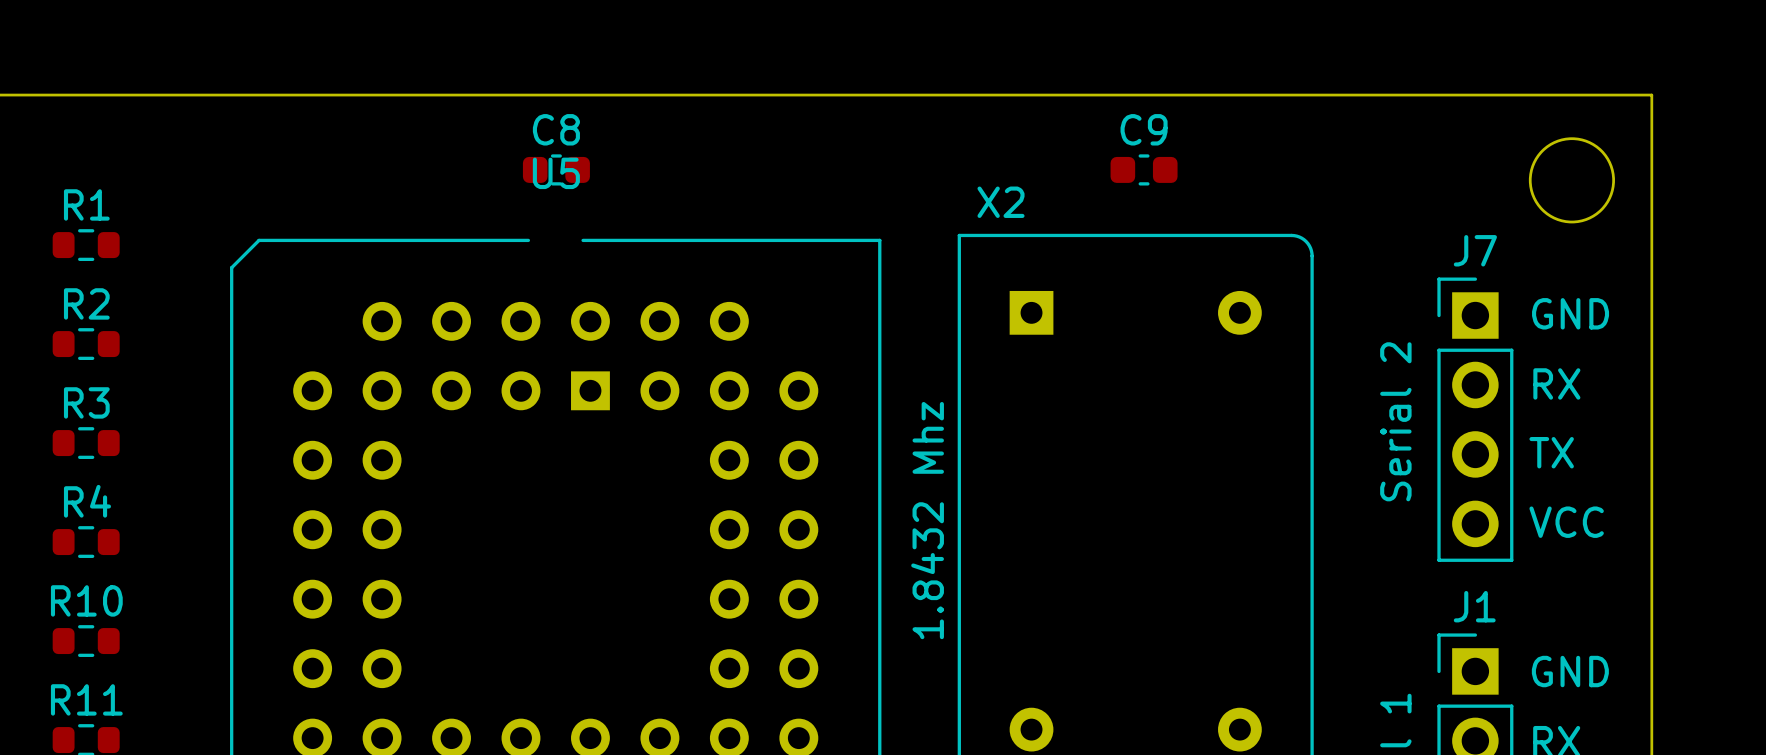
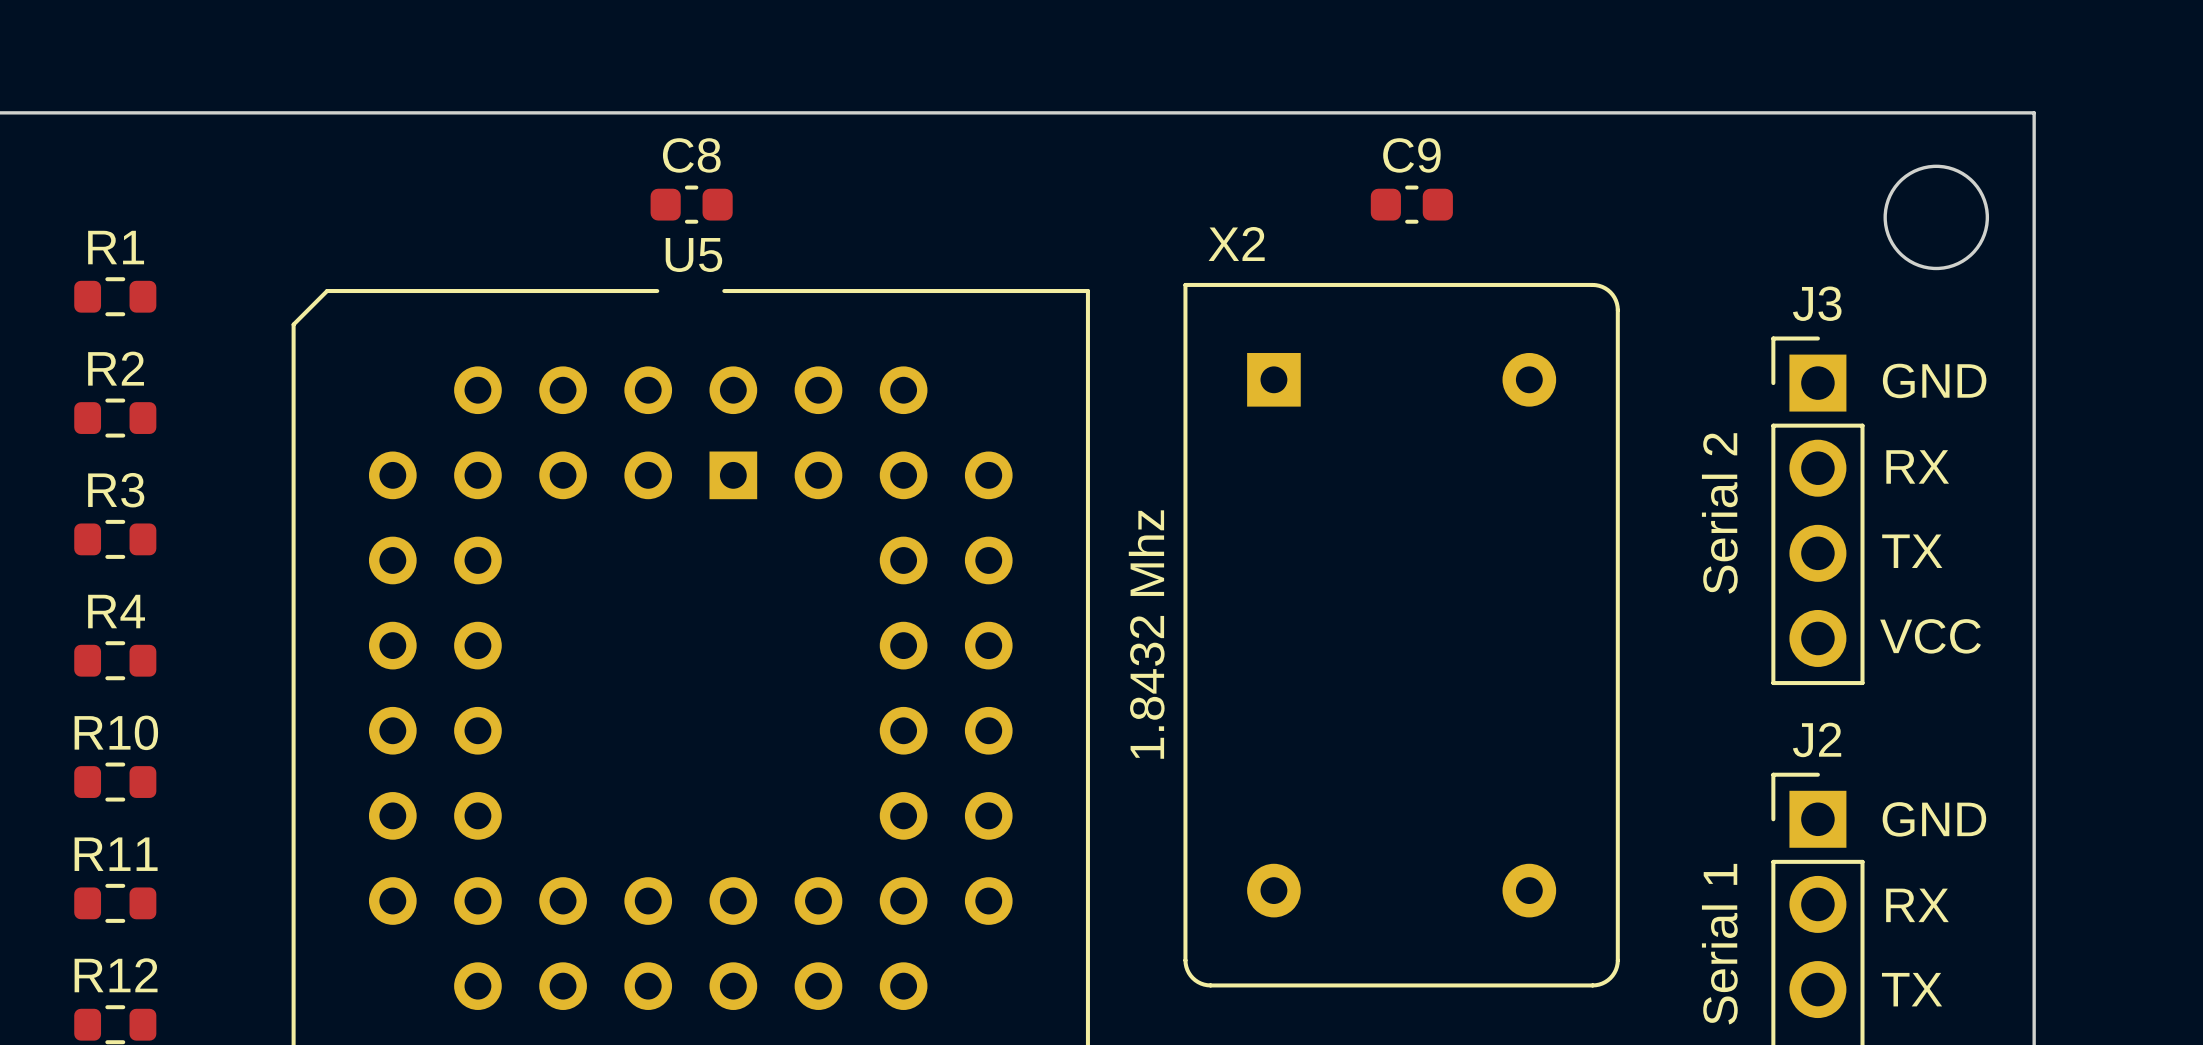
U5 name position: U5 (556, 173) -> U5 (693, 255)
J7 name: J7 (1475, 250) -> J3 (1817, 303)
J1 name: J1 (1474, 606) -> J2 (1817, 739)

